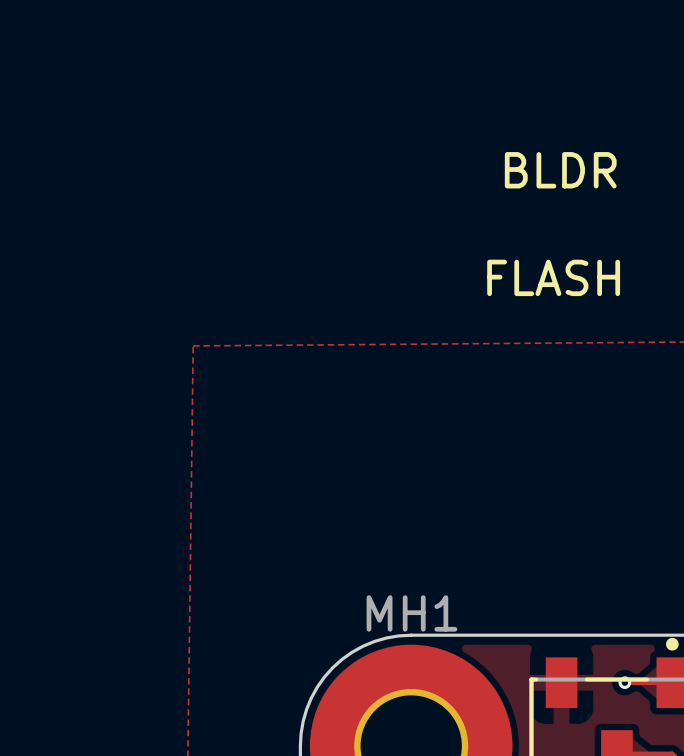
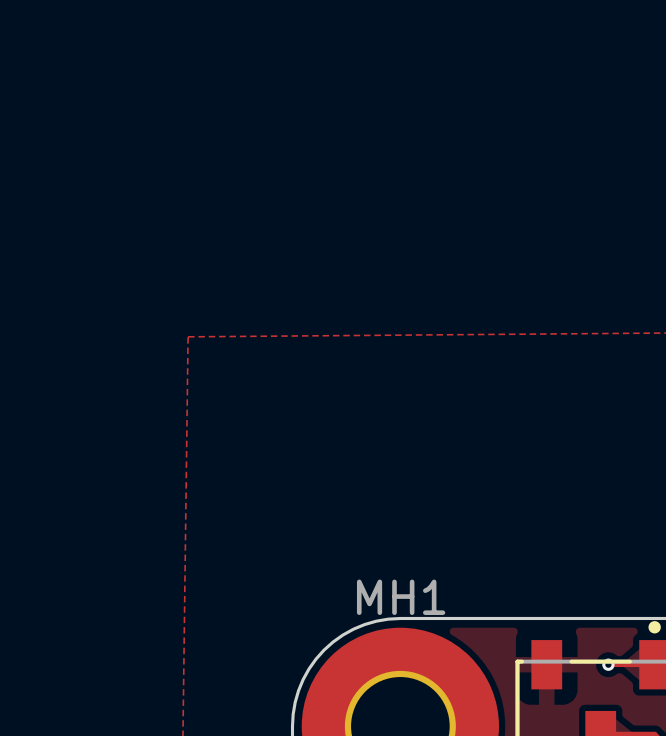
text: BLDR (560, 170) -> none
text: FLASH (553, 277) -> none

